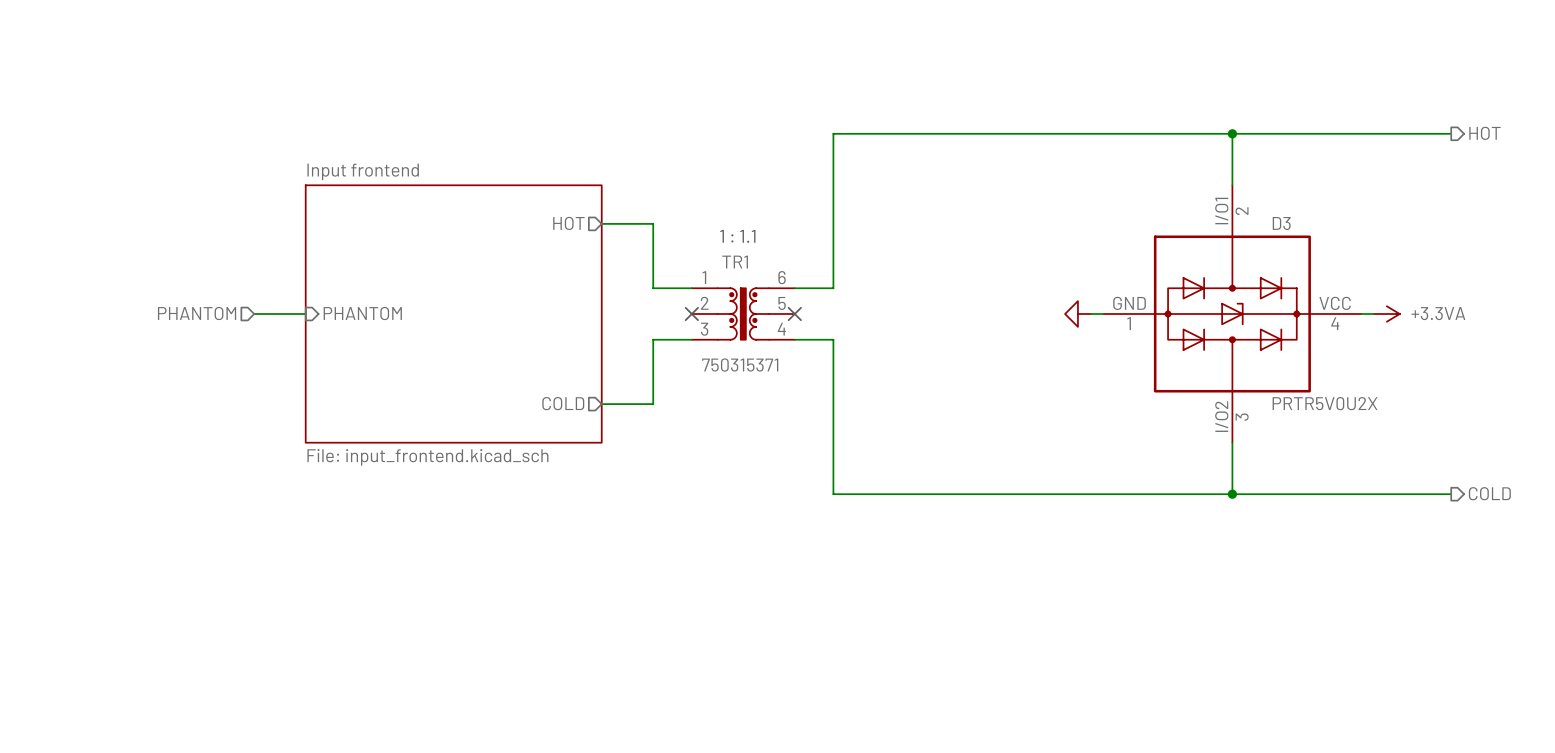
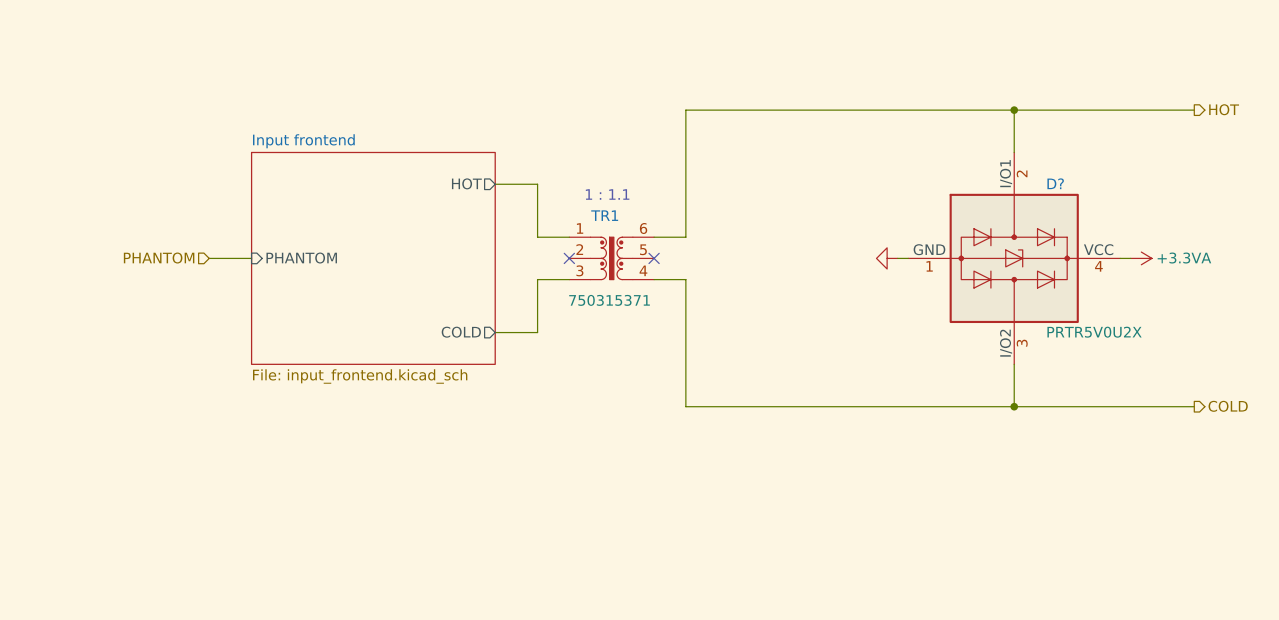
D3 name: D3 (1281, 223) -> D? (1055, 183)

